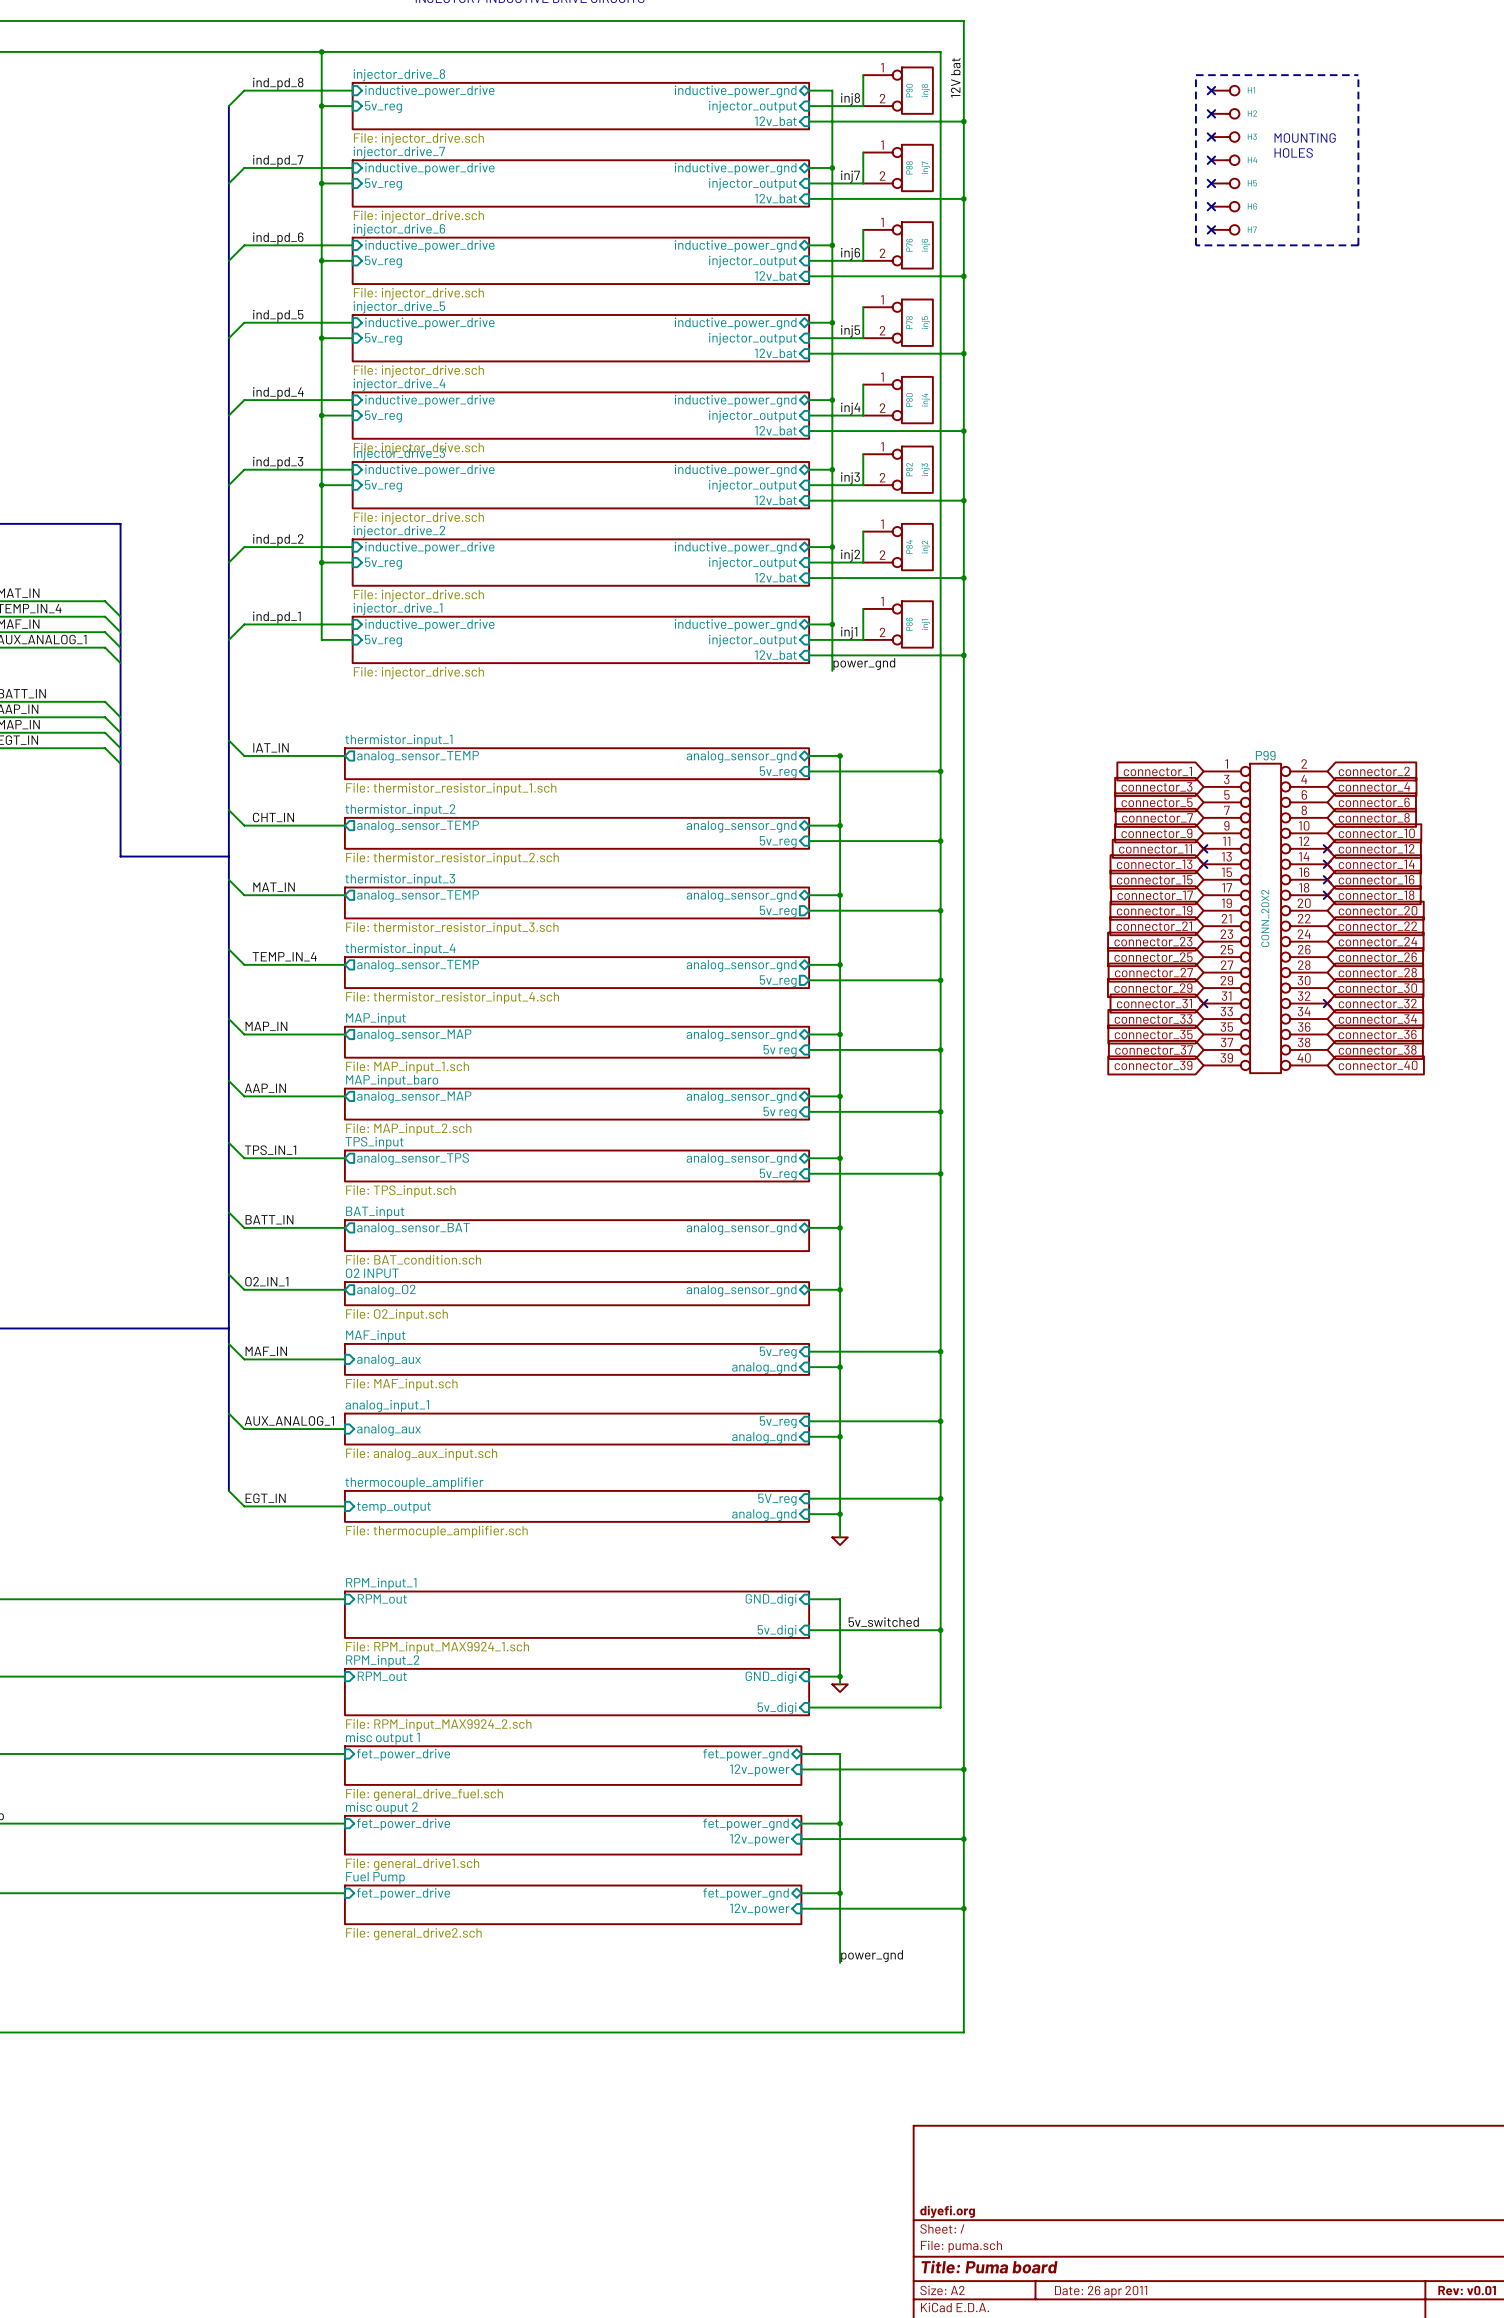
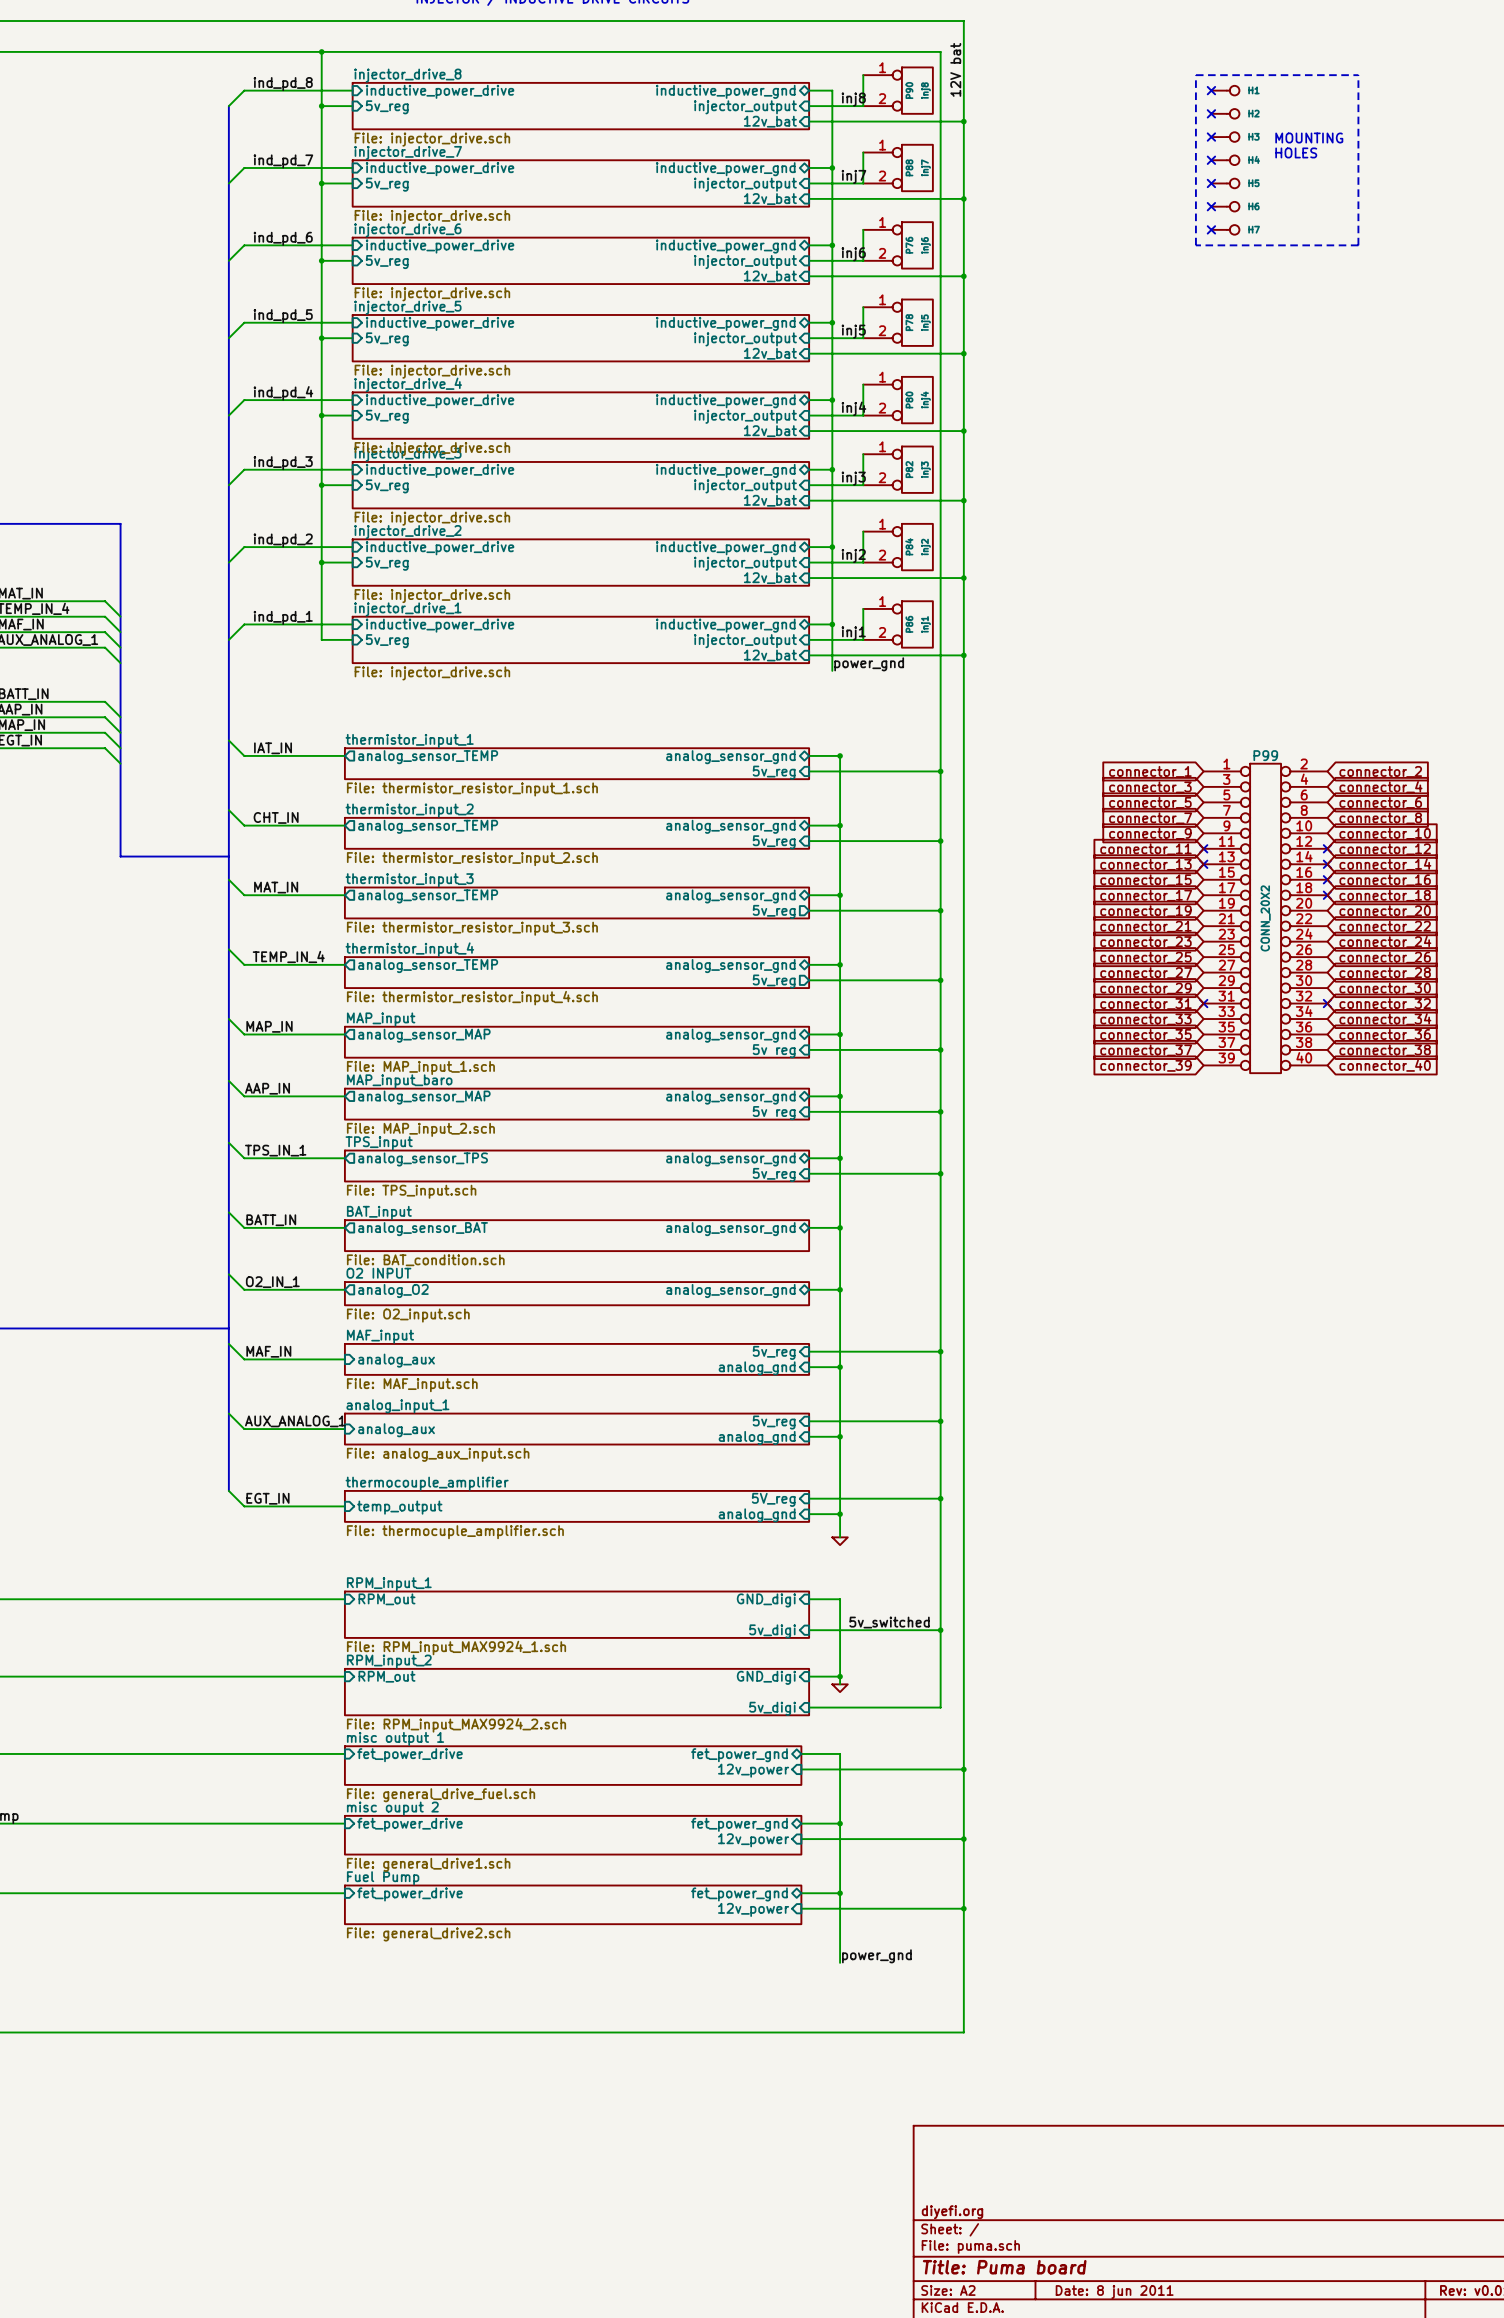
title block: Date: 26 apr 2011 (1101, 2291) -> Date: 8 jun 2011 (1114, 2292)

